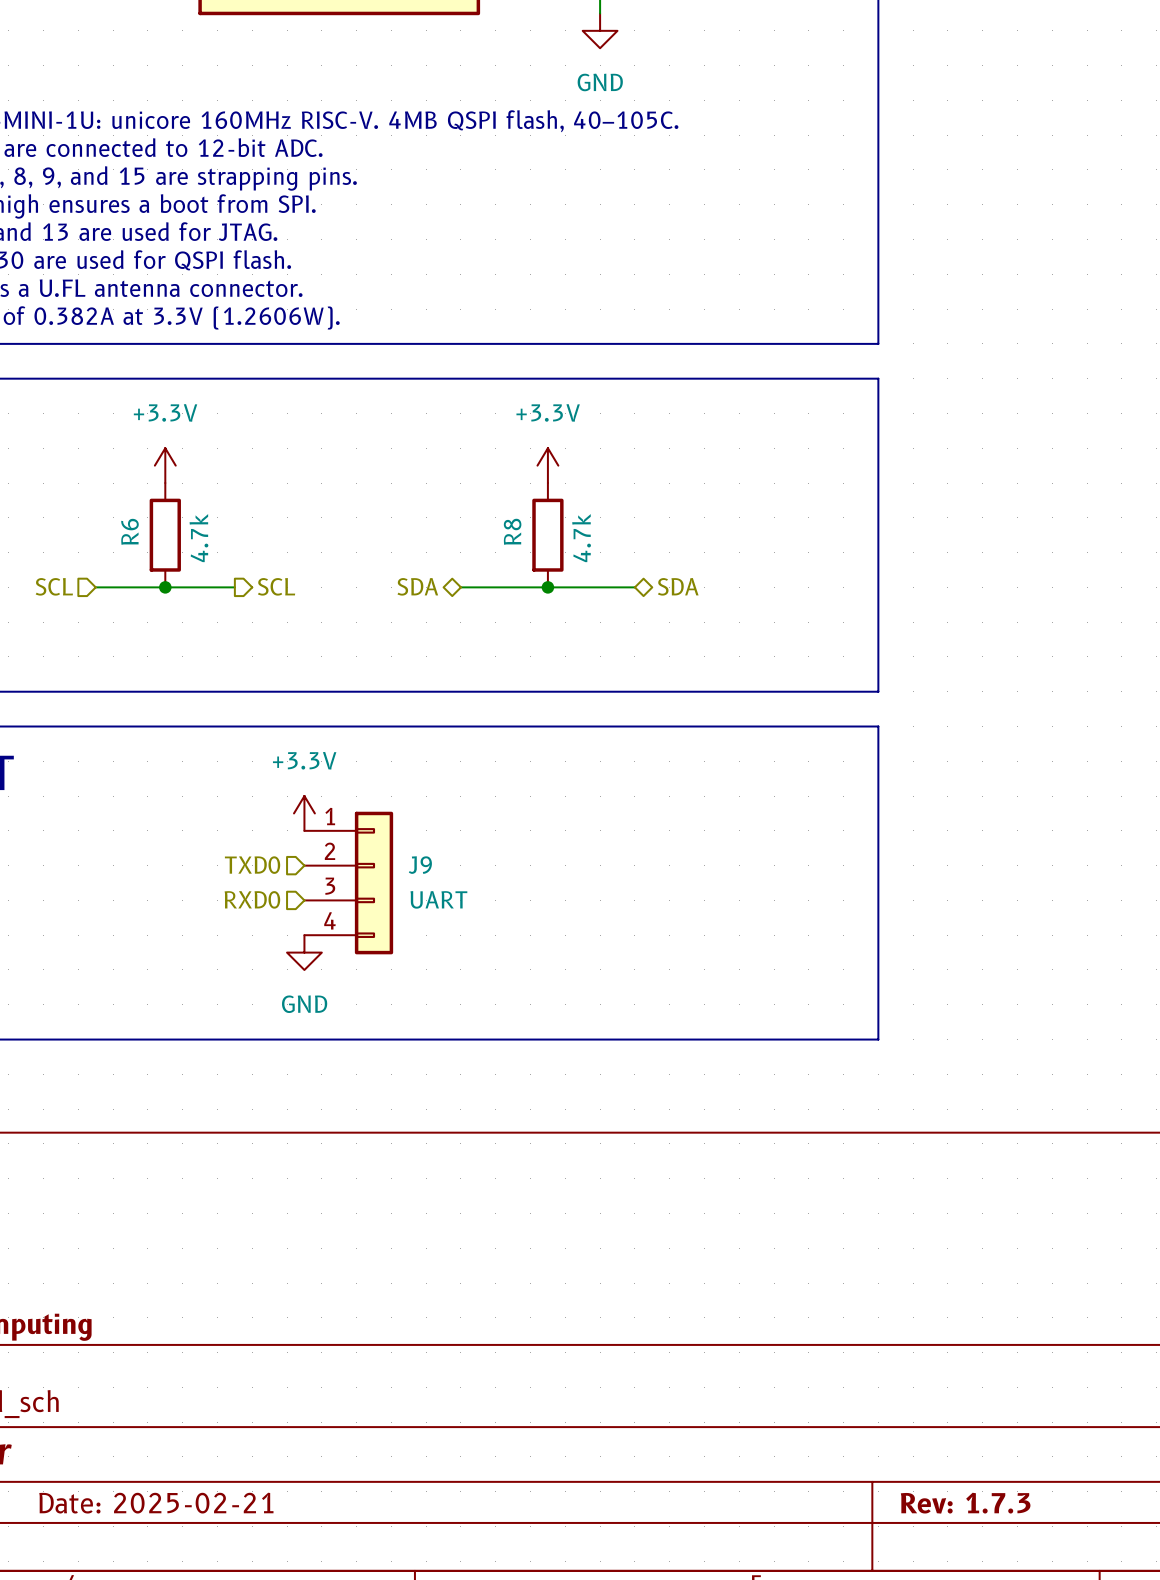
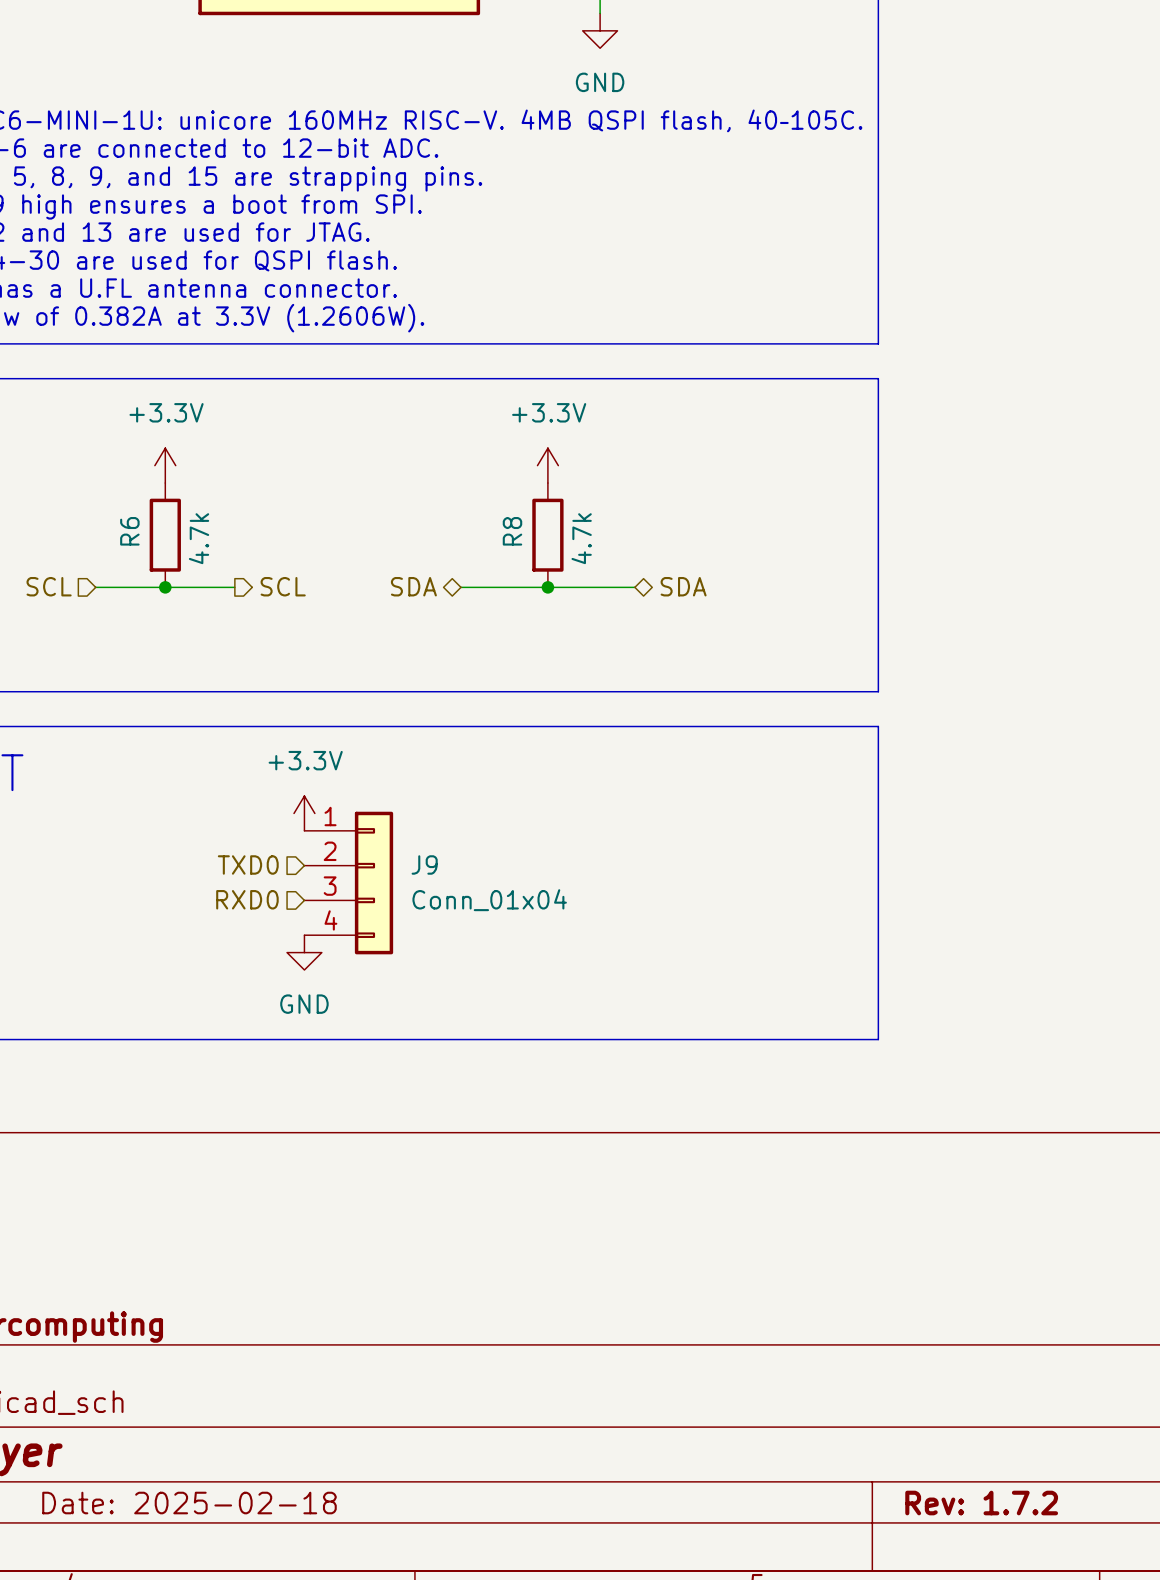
J9 value: UART (438, 899) -> Conn_01x04 (489, 900)
title block: Date: 2025-02-21 (156, 1503) -> Date: 2025-02-18 (189, 1503)
title block: Rev: 1.7.3 (965, 1503) -> Rev: 1.7.2 (981, 1503)

